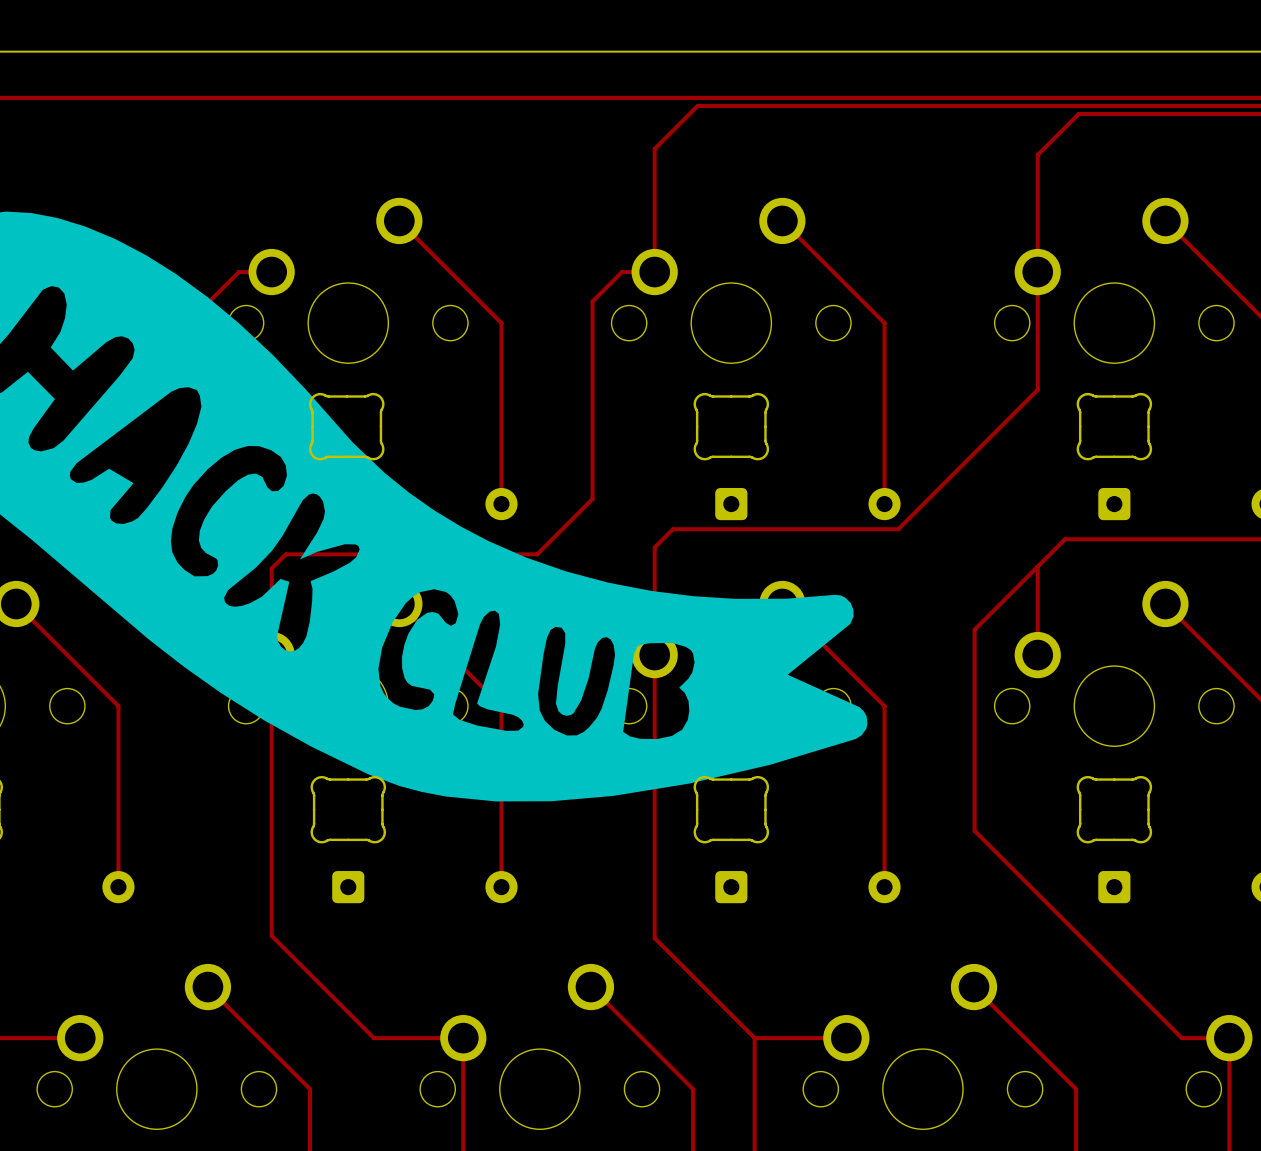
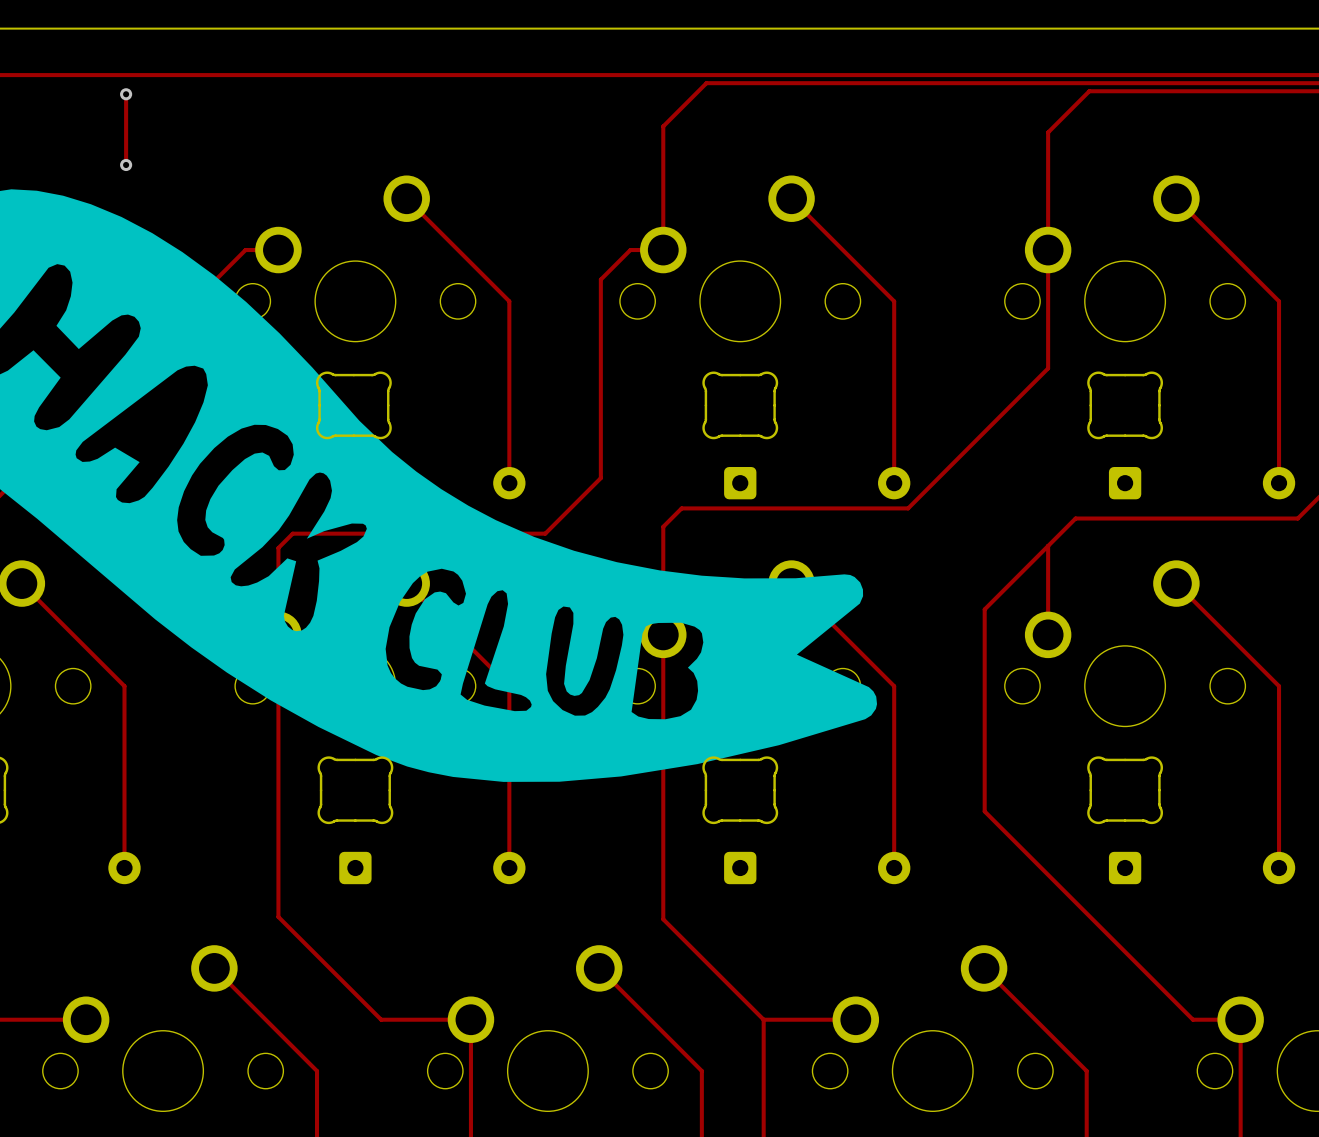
track: none -> (126, 94) (126, 164)
via: none -> (126, 94)
via: none -> (126, 164)

